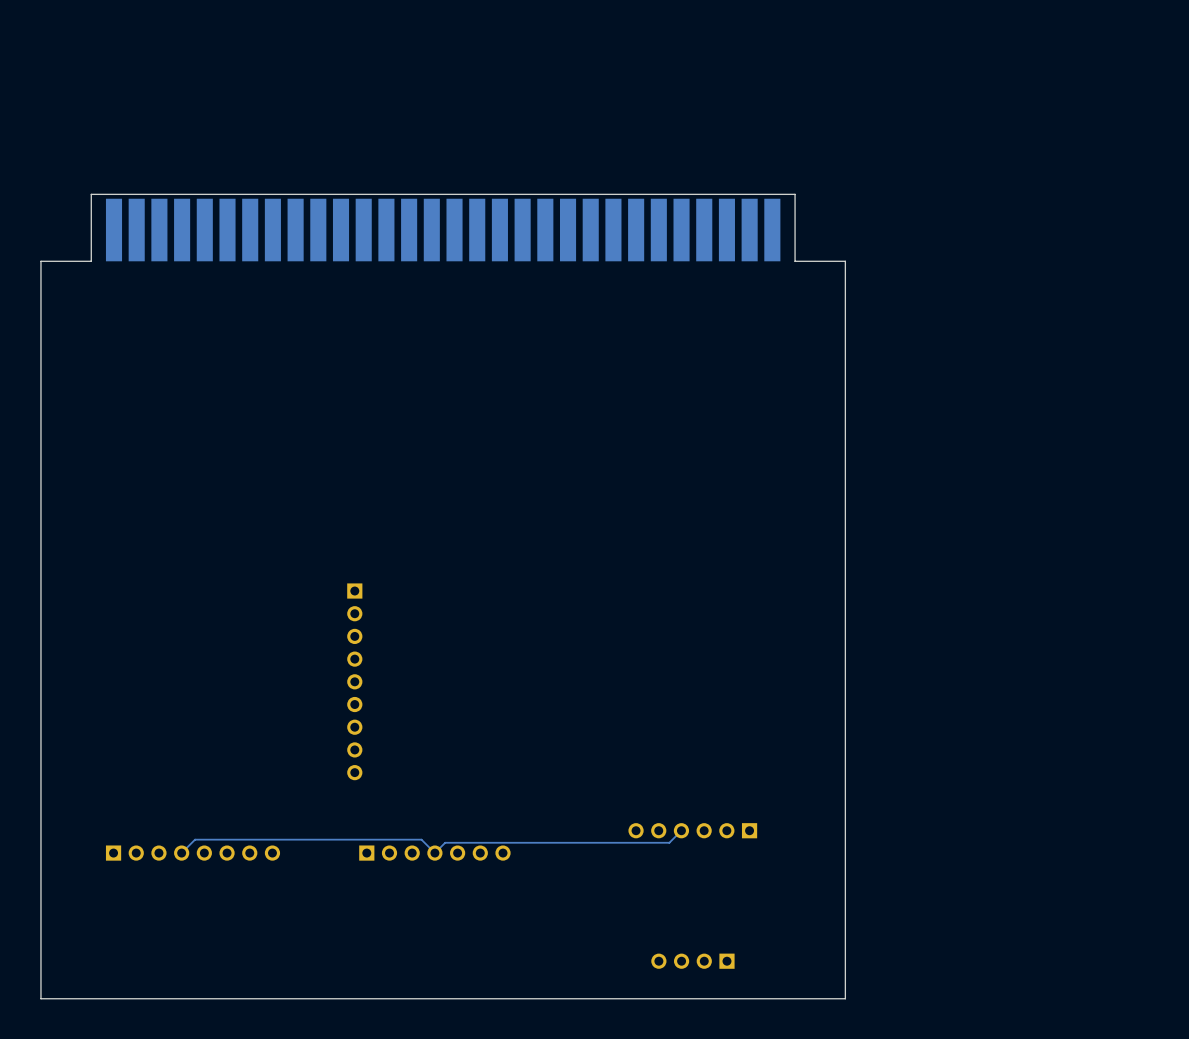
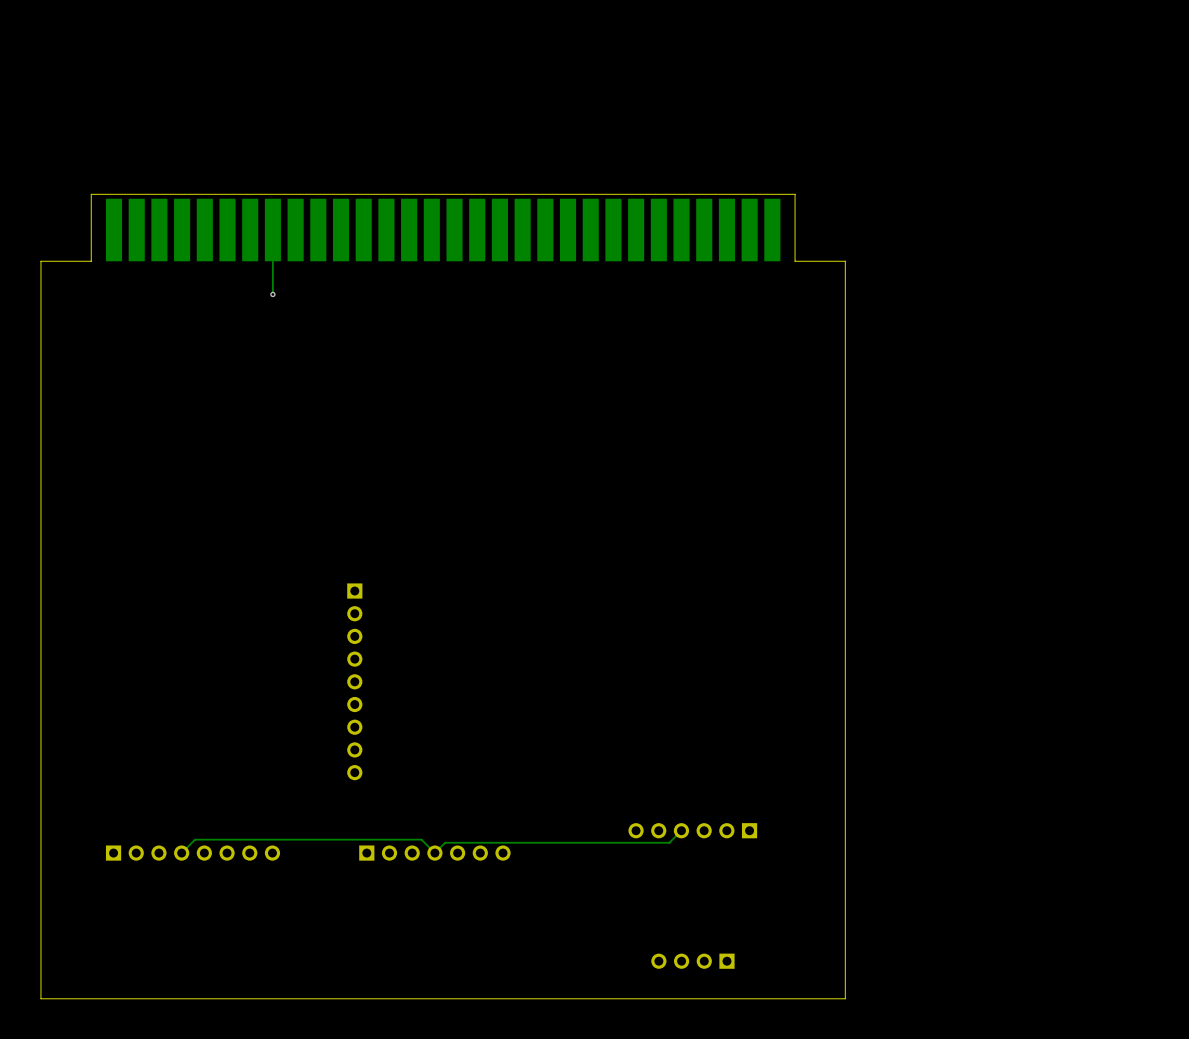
track: none -> (272, 230) (272, 294)
via: none -> (272, 294)

